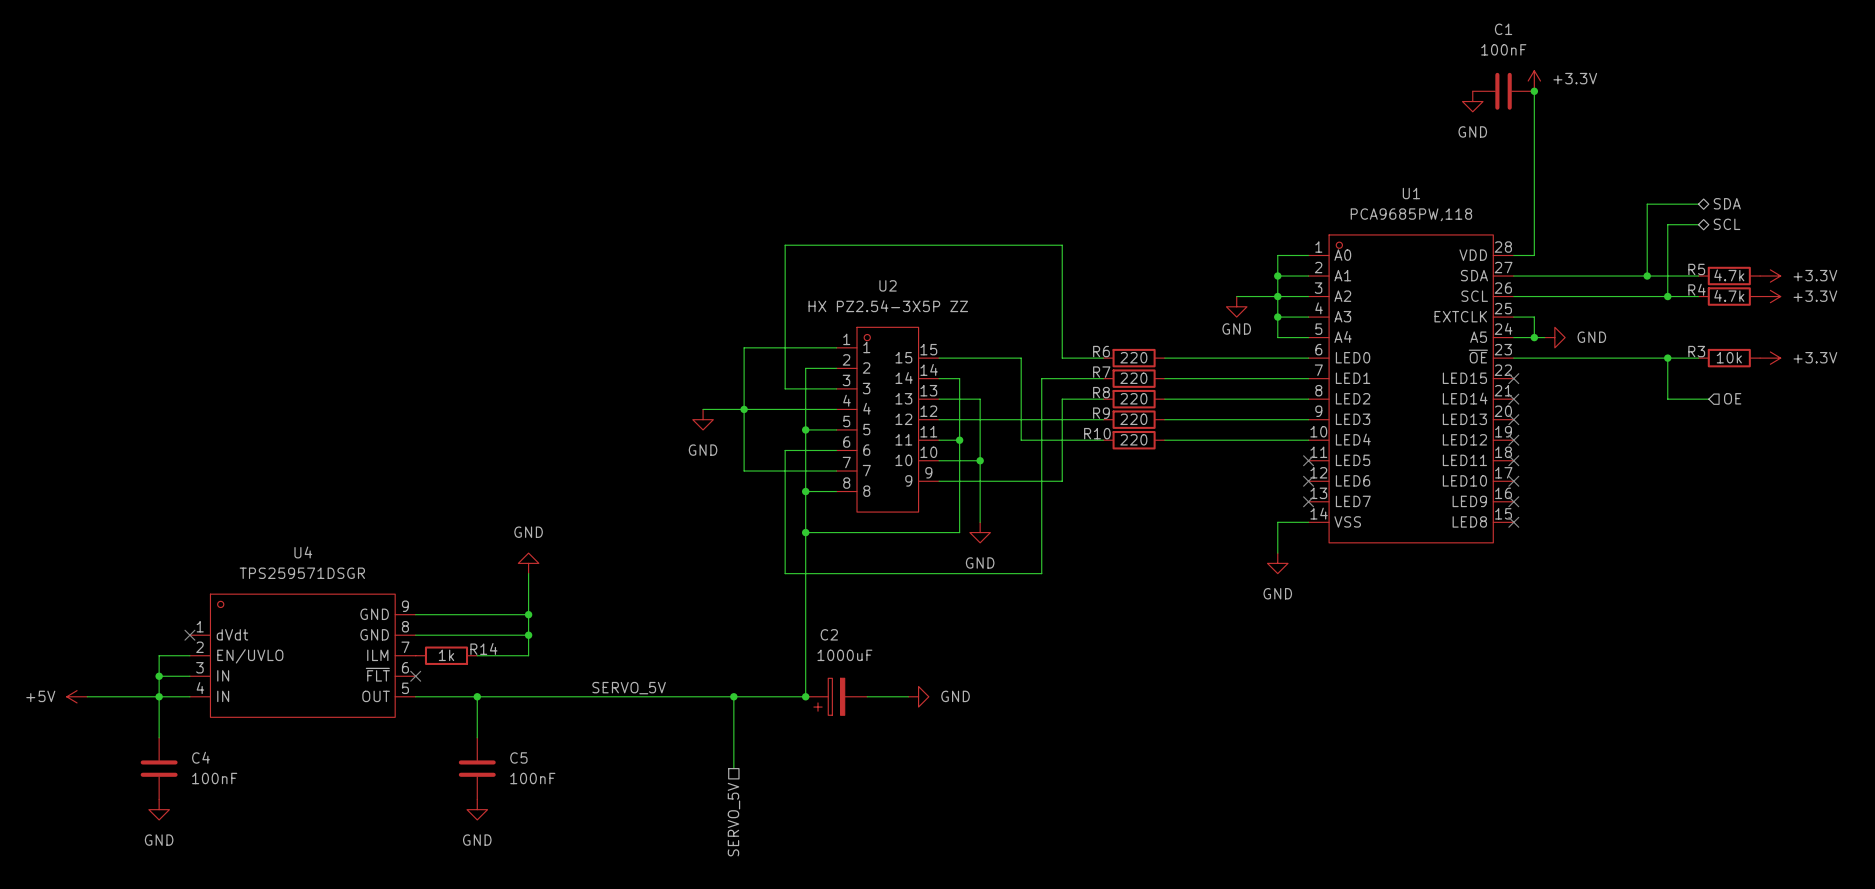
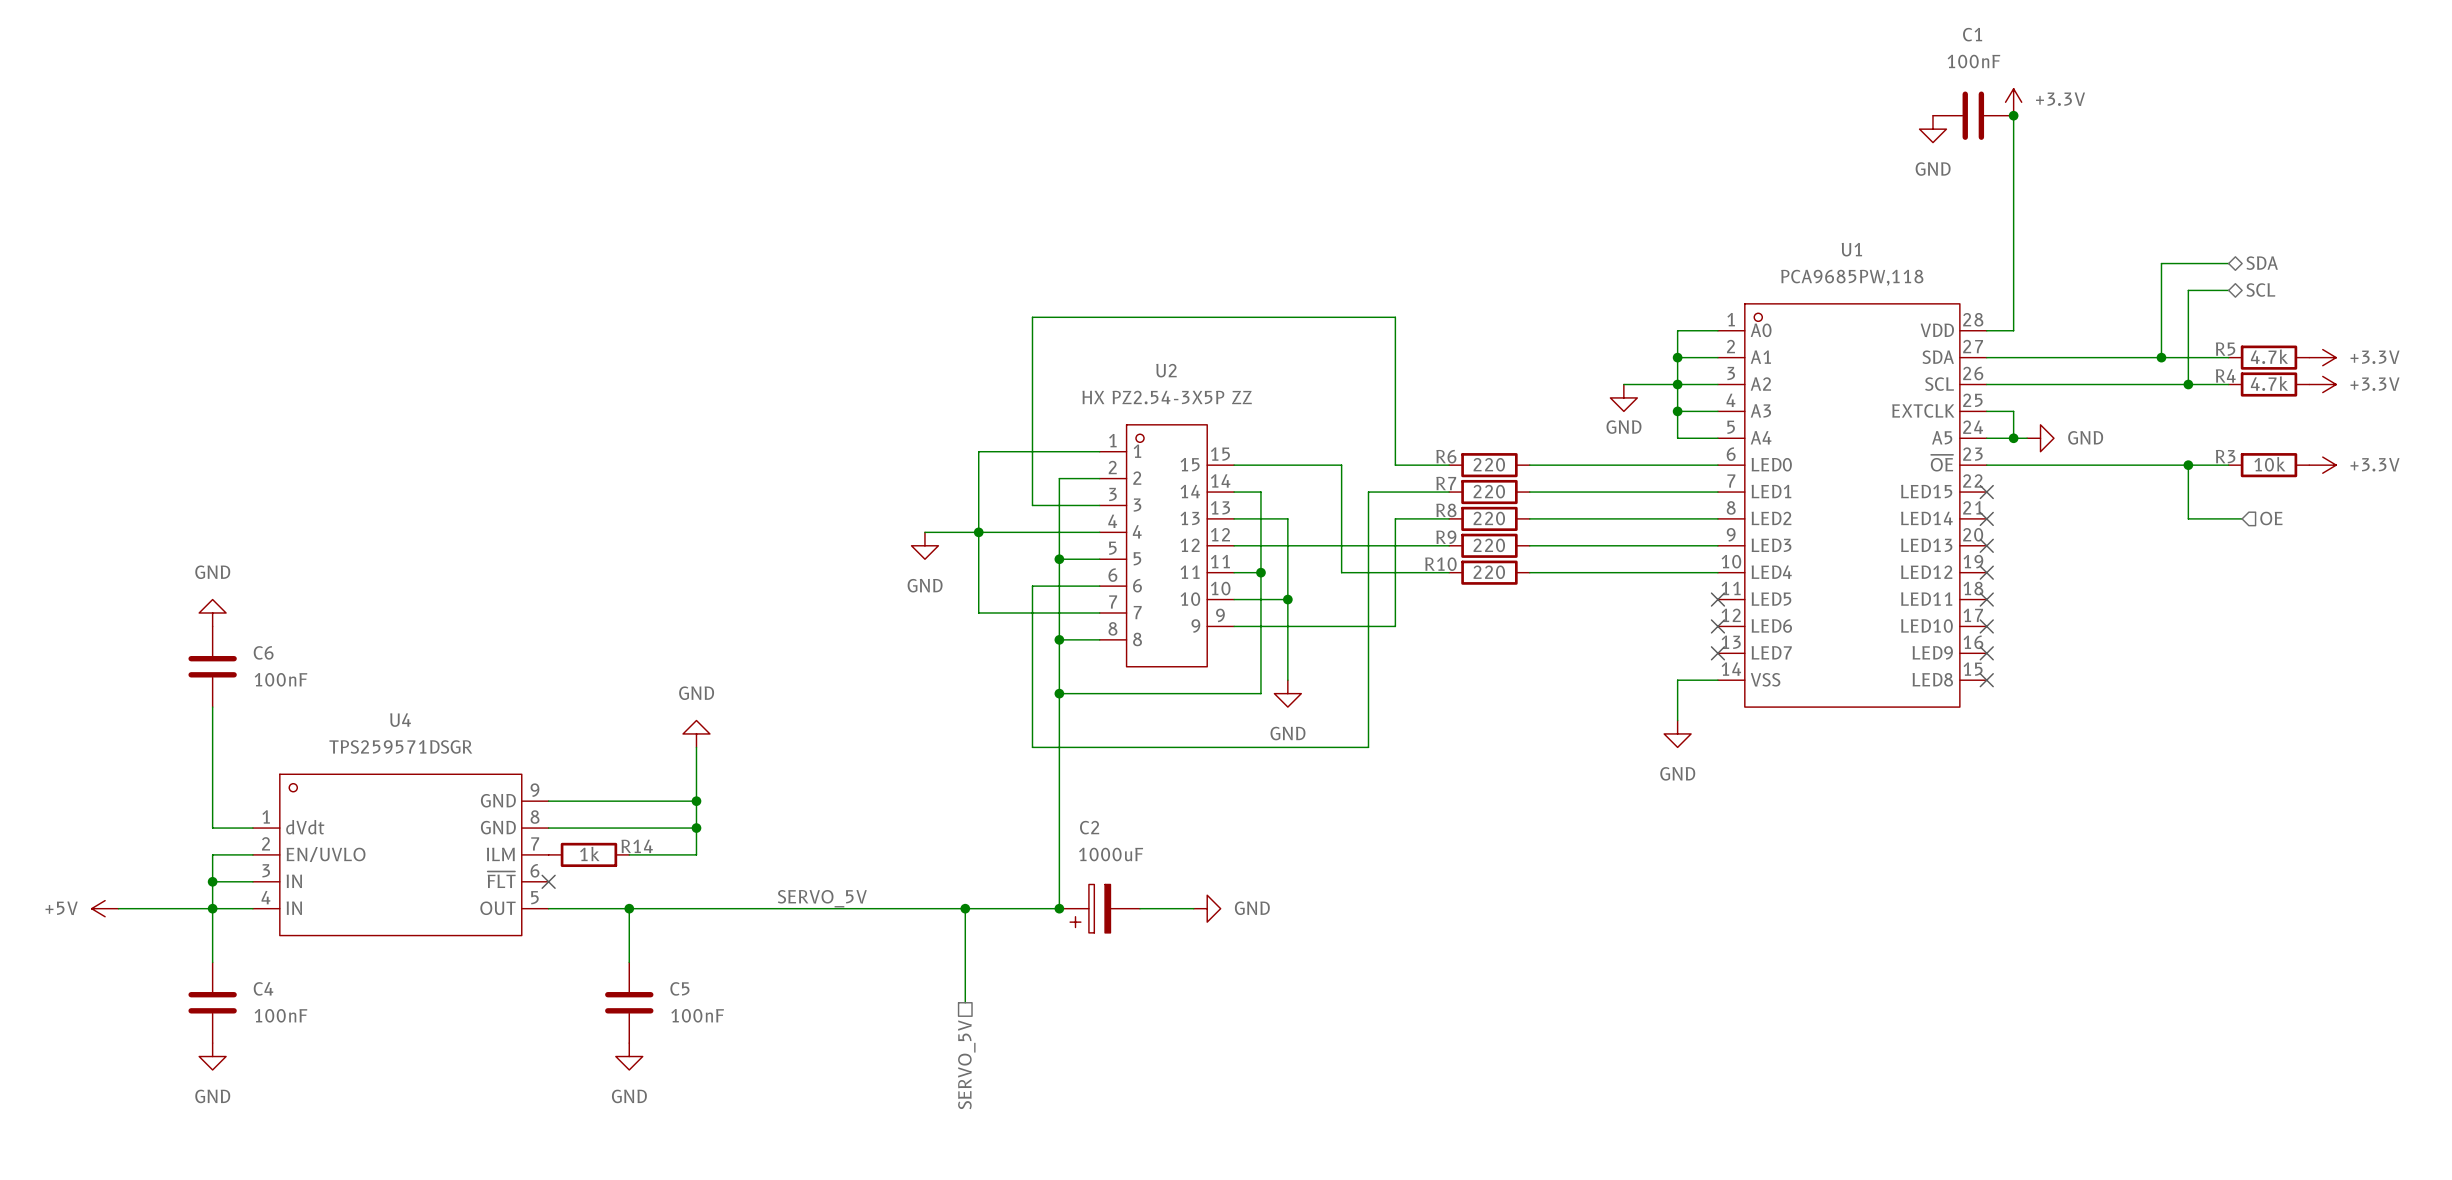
power symbol: none -> GND (212, 612)
C6: none -> 100nF (212, 666)
wire: none -> (212, 707) (212, 828) (252, 828)
no-connect mark: (189, 635) -> none

